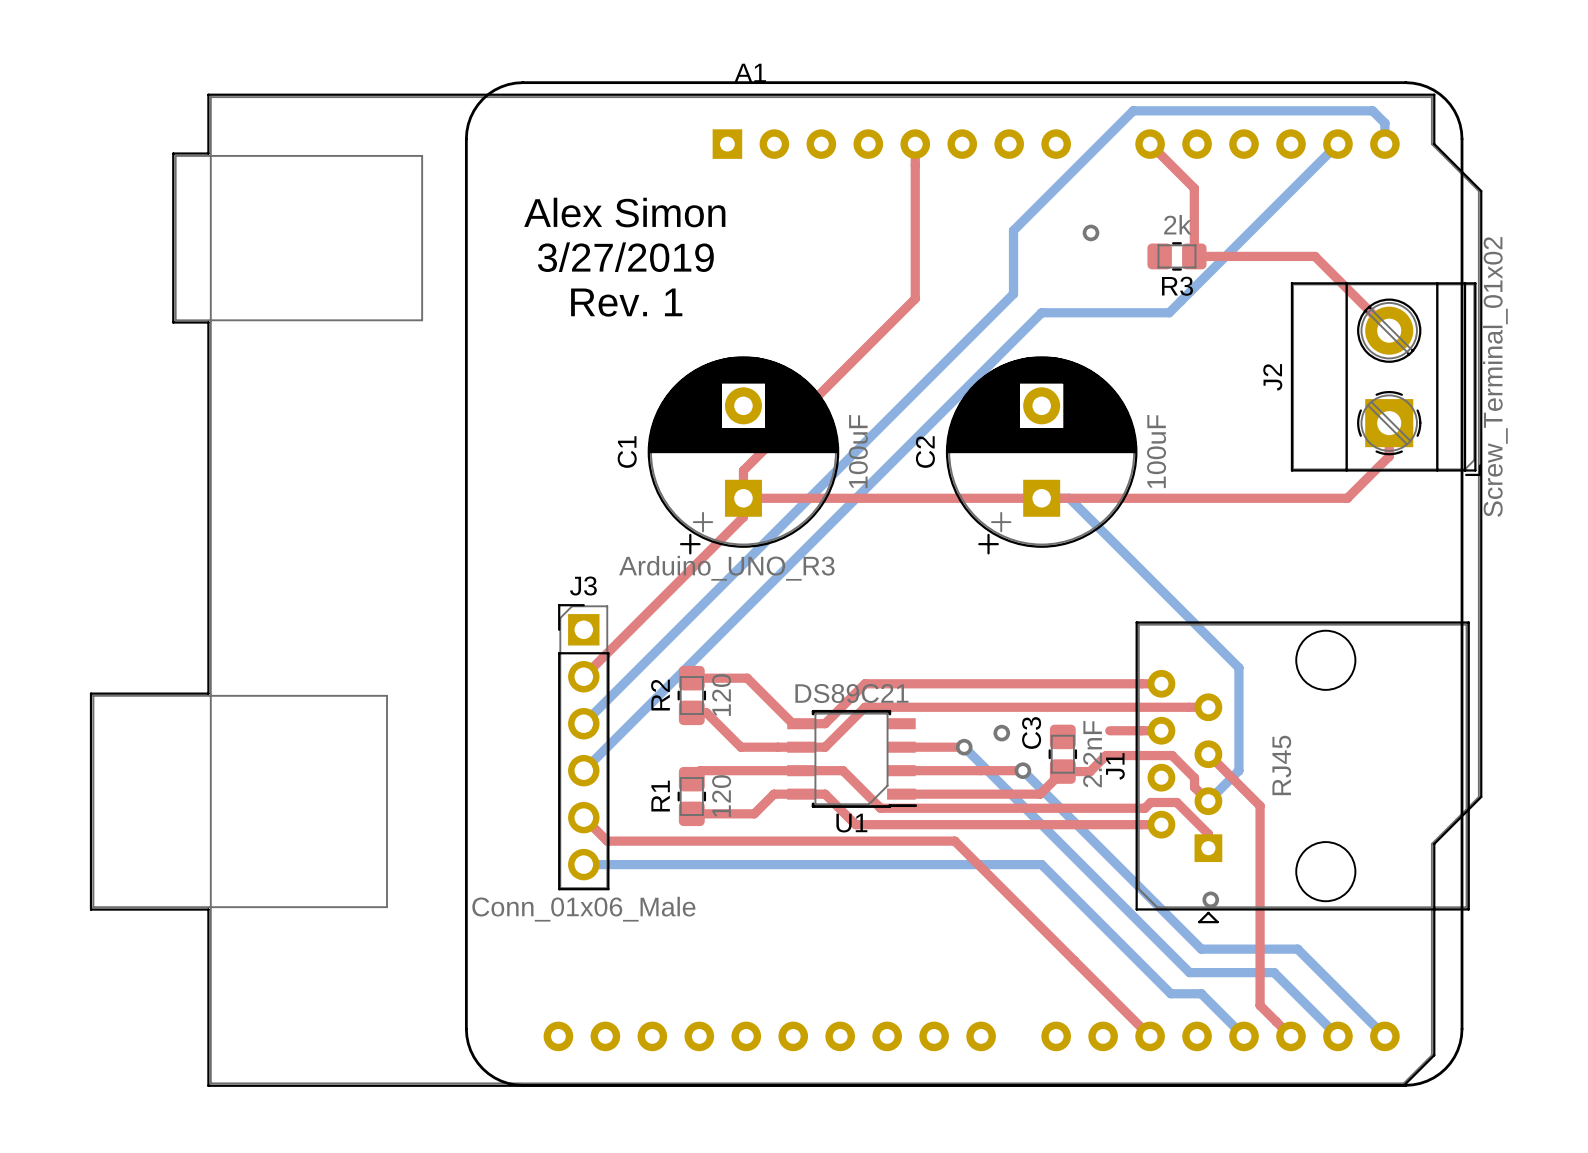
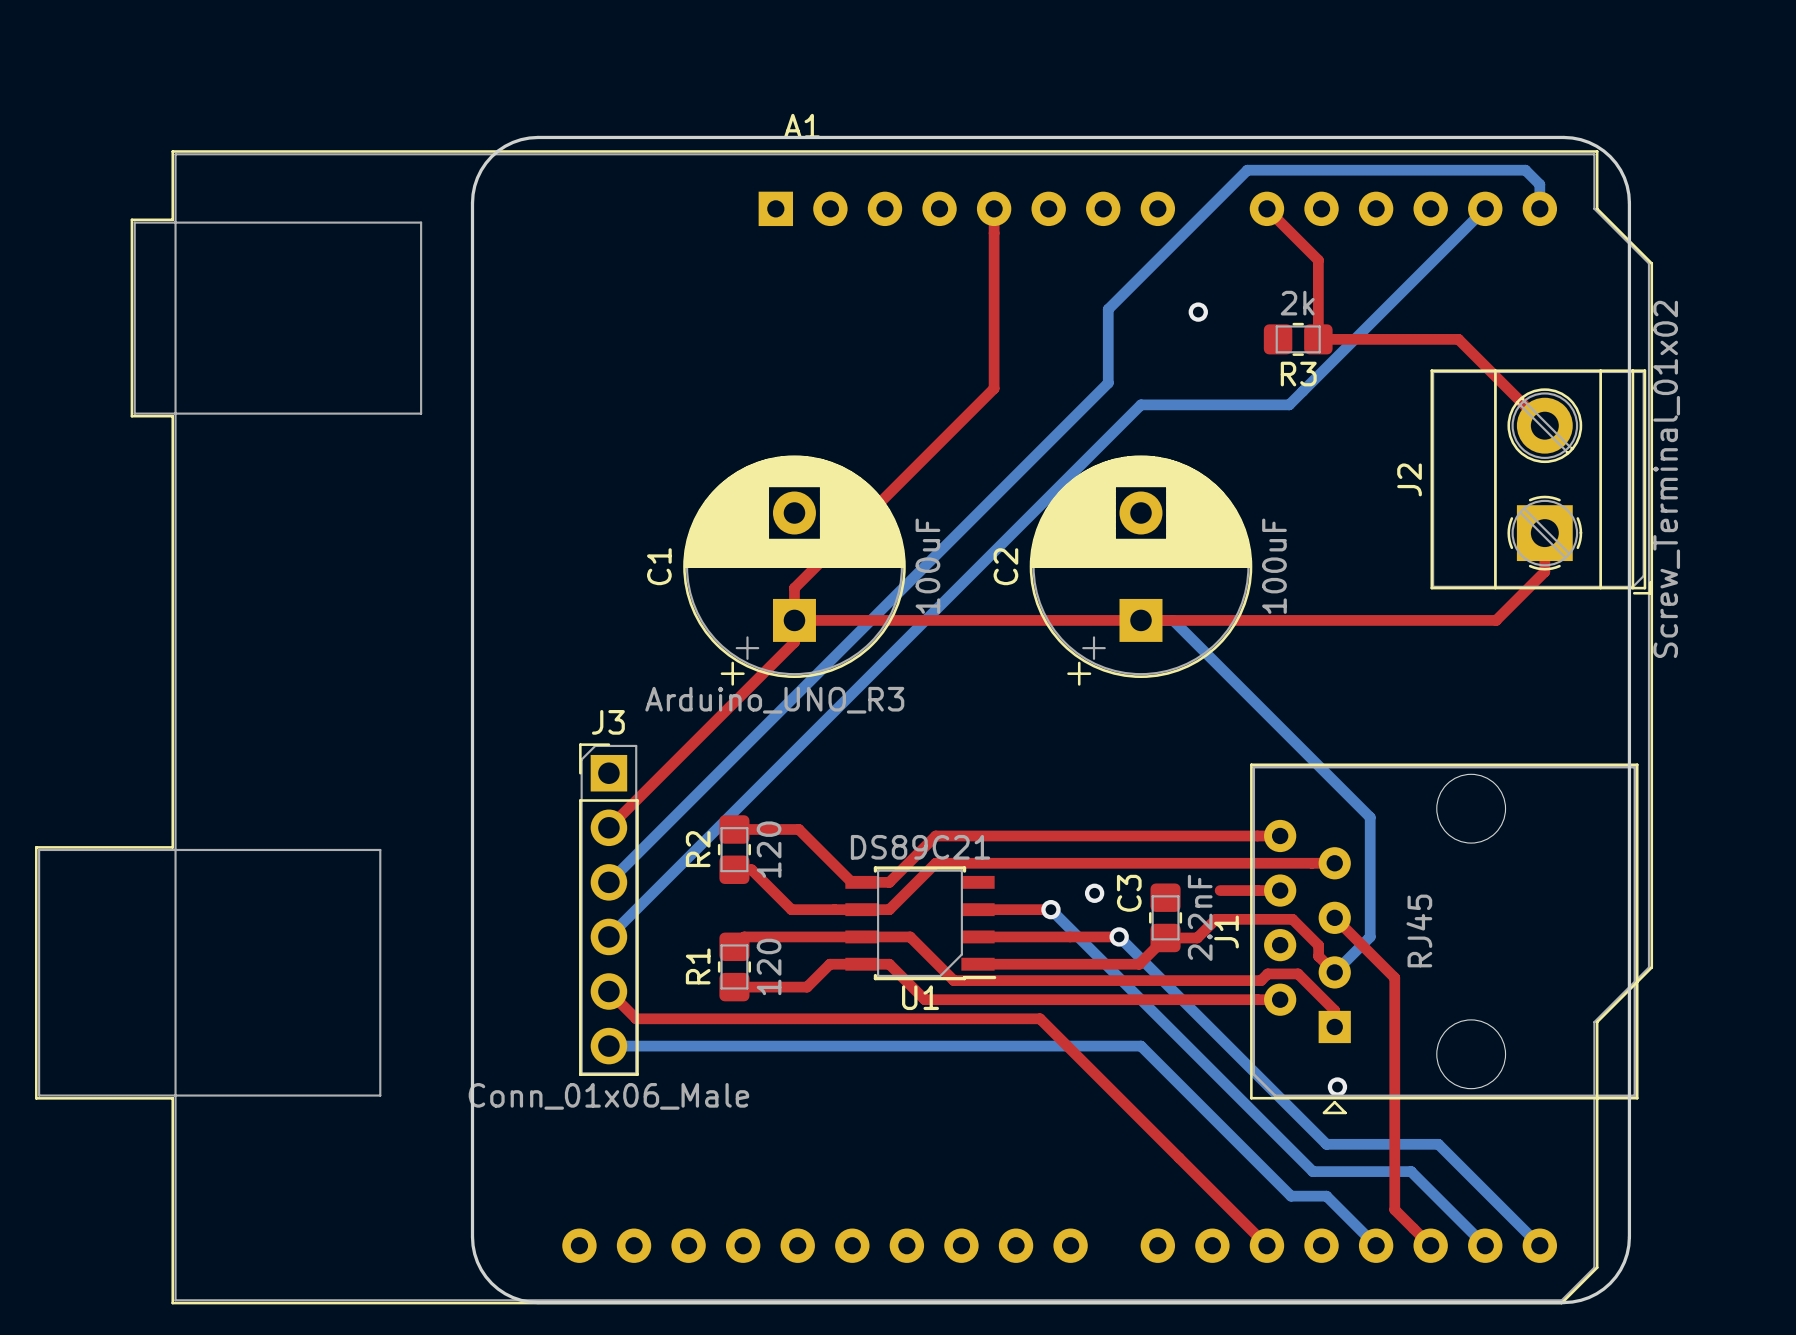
text: Alex Simon (624, 212) -> none
text: 3/27/2019 (625, 257) -> none
text: Rev. 1 (626, 302) -> none

